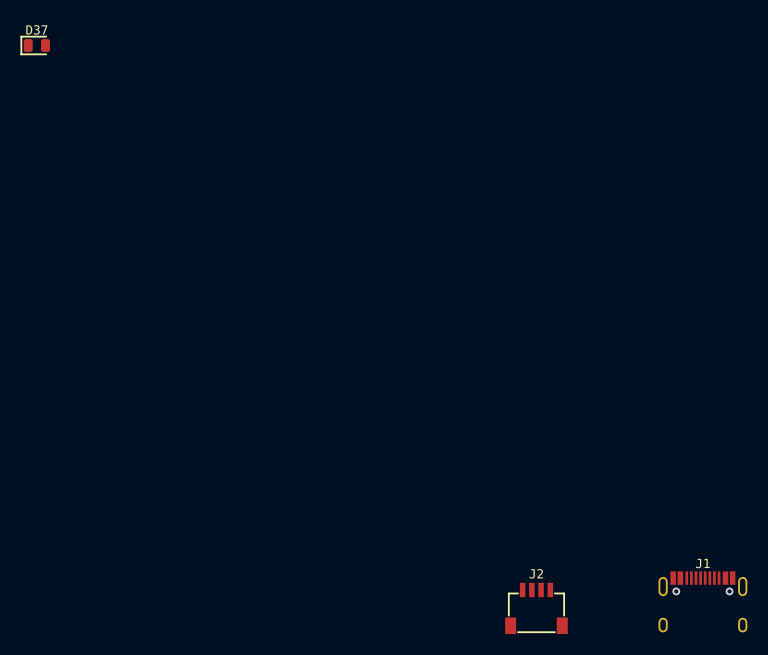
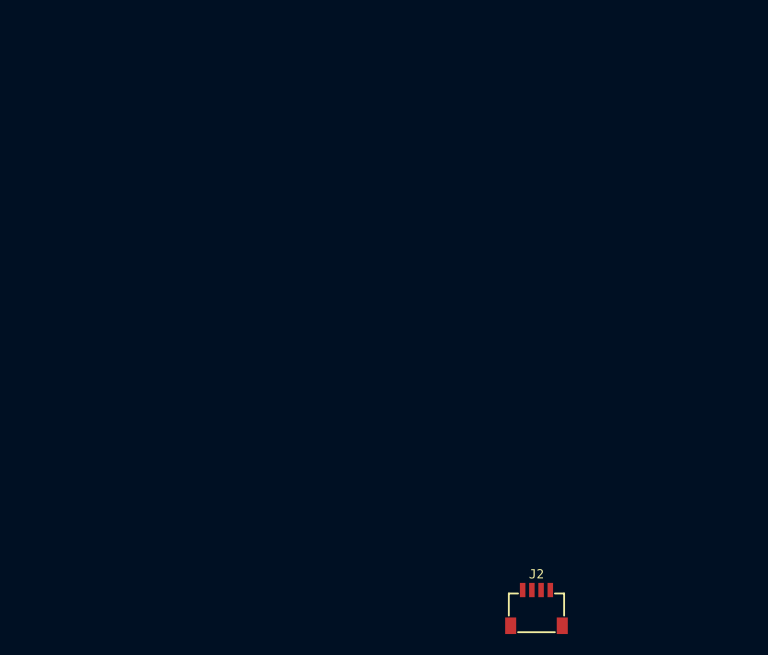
D37: (35, 45) -> none
J1: (702, 601) -> none

